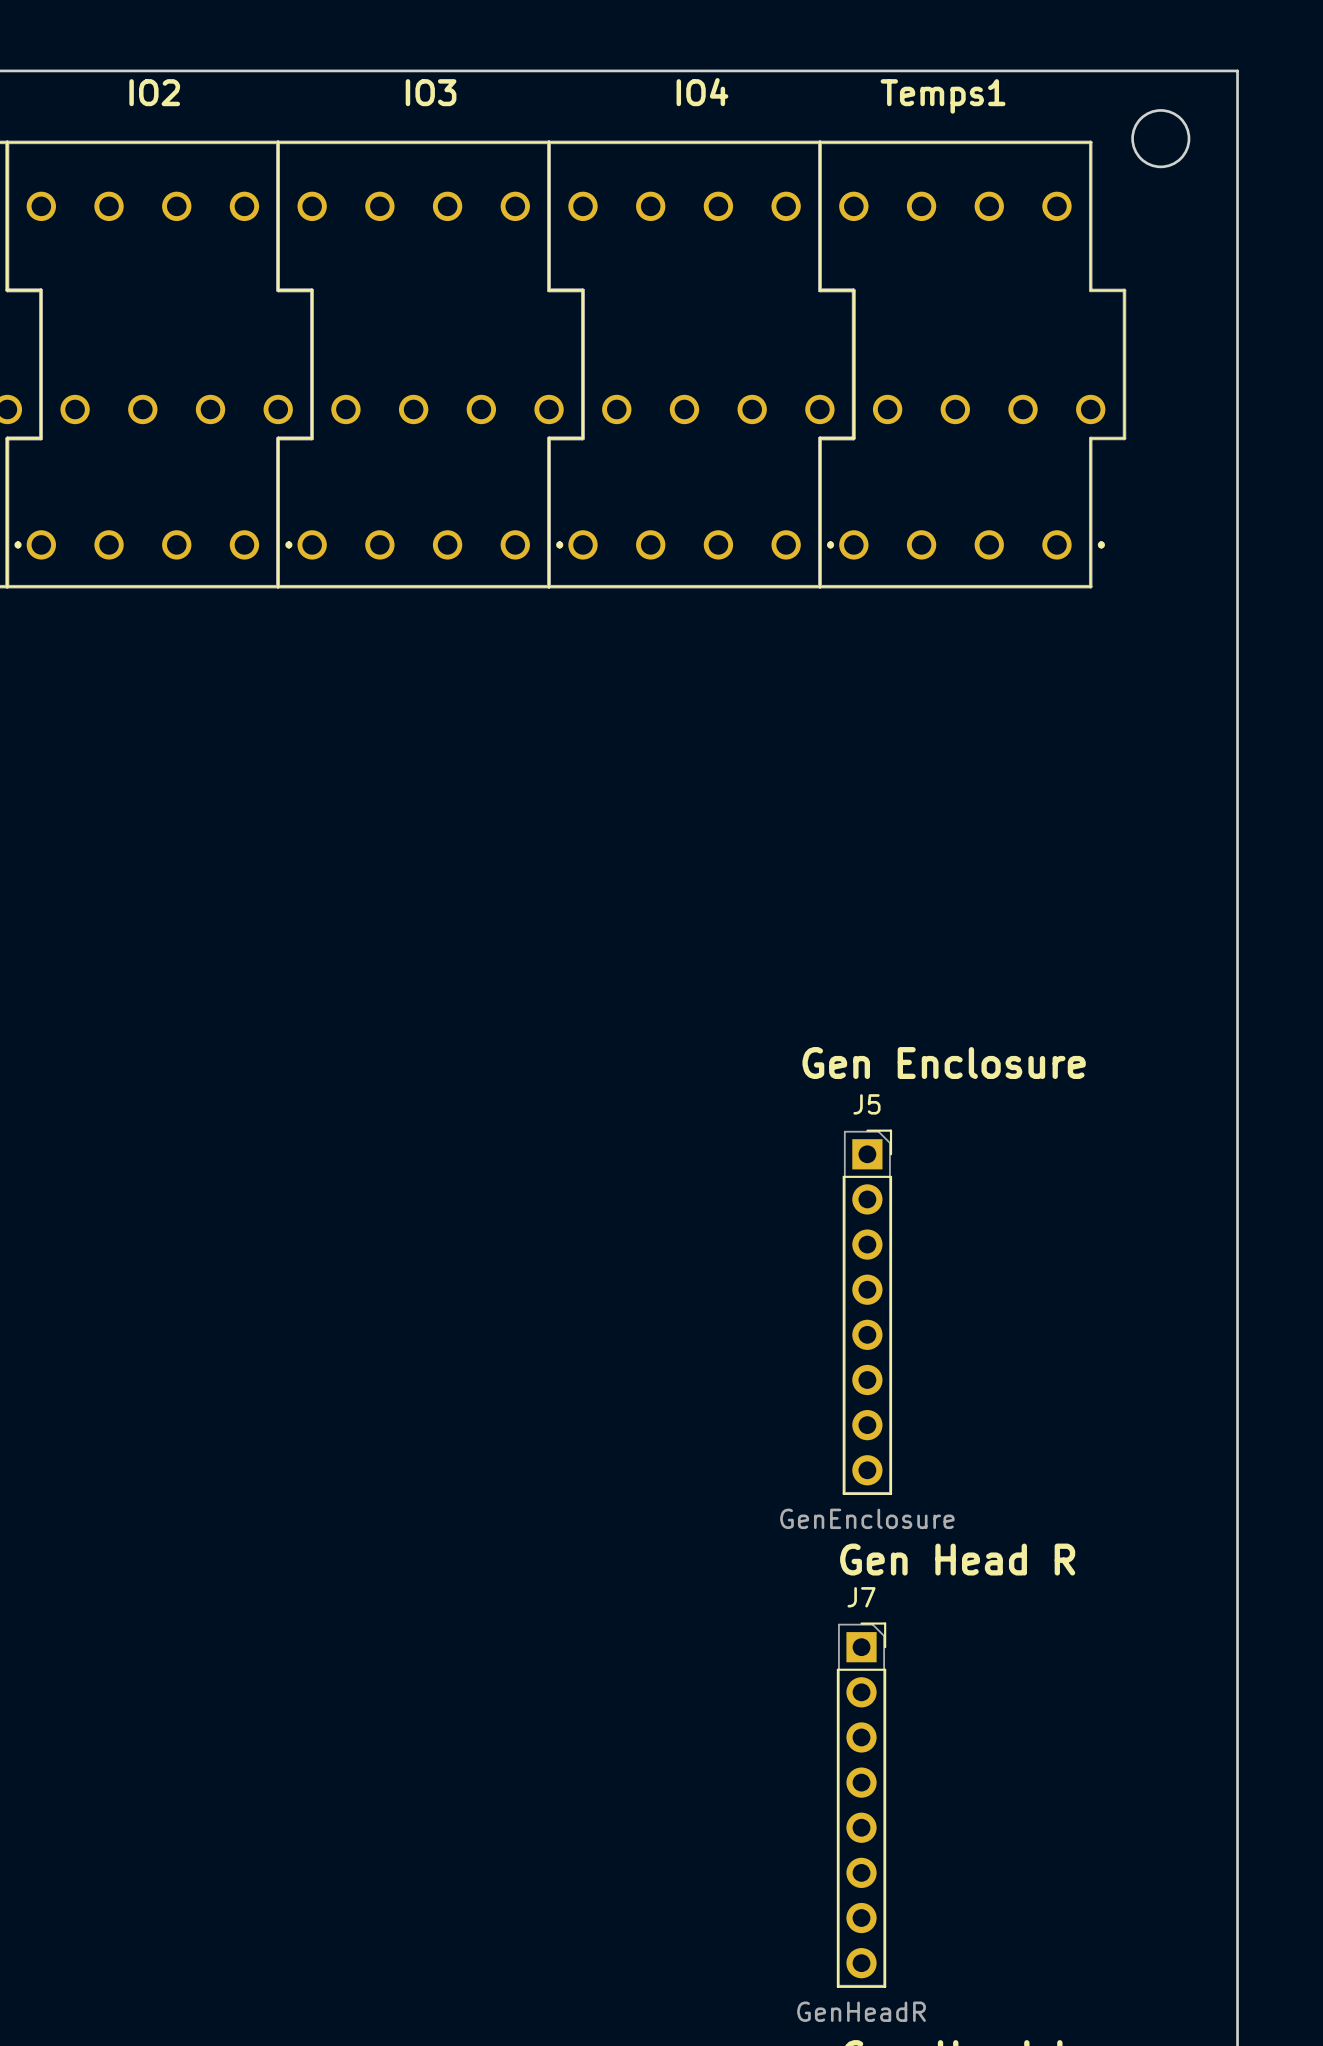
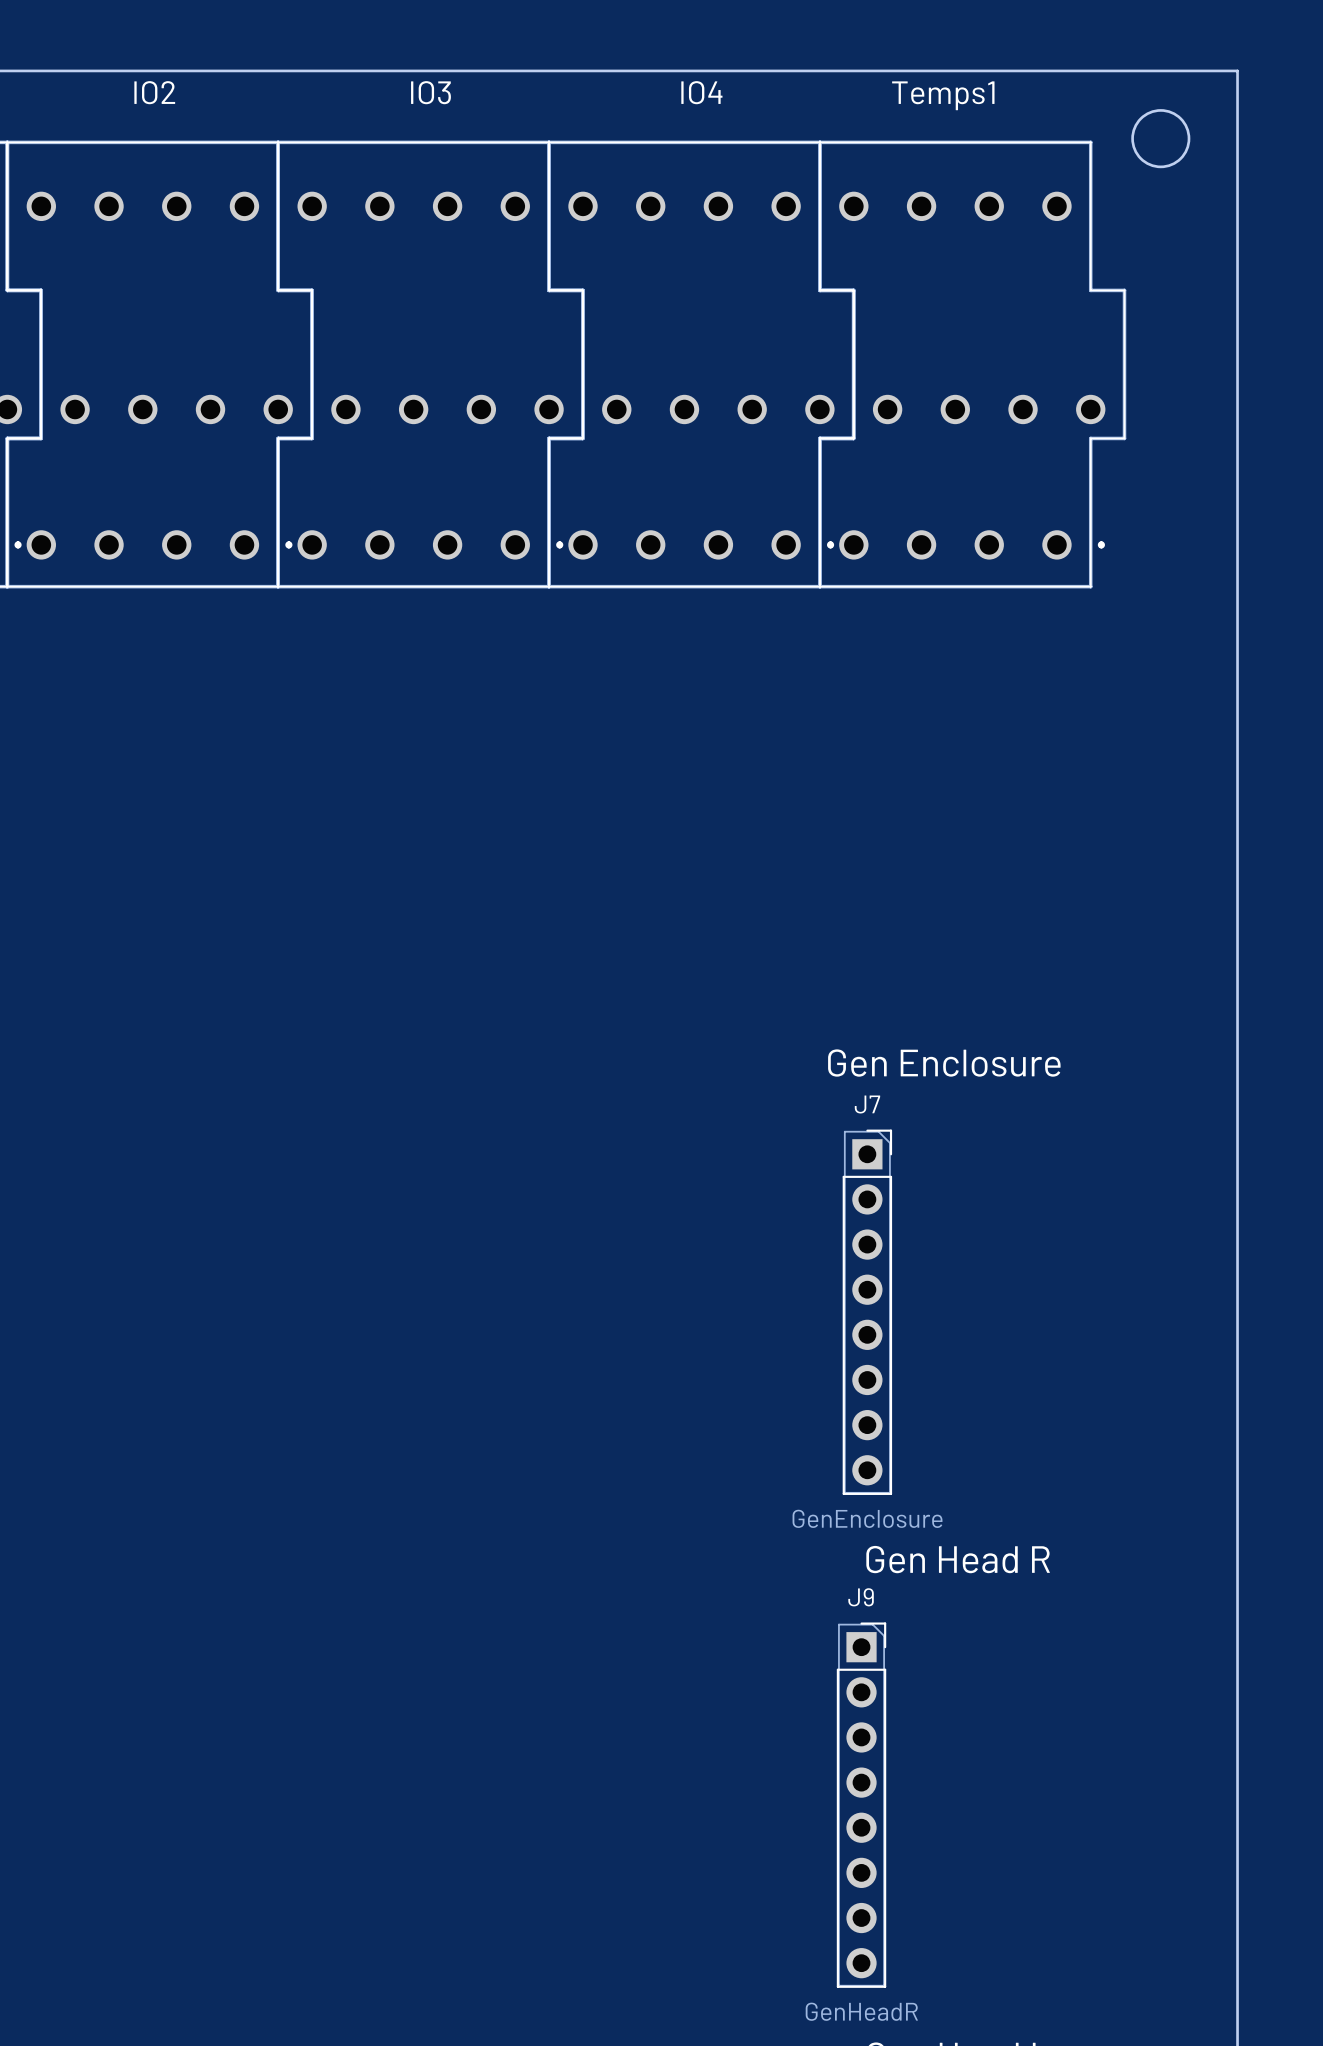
J5 name: J5 (866, 1104) -> J7 (867, 1104)
J7 name: J7 (861, 1597) -> J9 (861, 1597)

